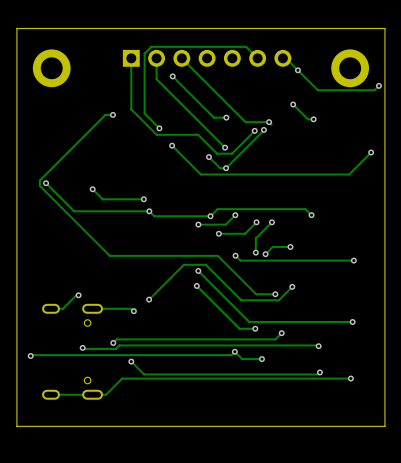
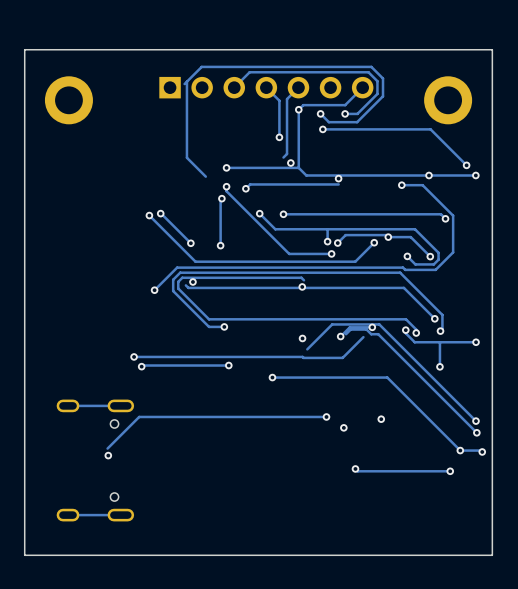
track: (151, 46) (246, 46) (257, 58) -> (195, 73) (201, 66) (371, 66) (383, 78) (383, 96) (357, 122) (328, 122) (320, 113)
track: (131, 58) (131, 109) (156, 134) (198, 134) (217, 153) (231, 153) (254, 130) -> none
track: (156, 58) (156, 79) (225, 147) -> none
track: (181, 58) (245, 122) (269, 122) (271, 124) -> (234, 87) (249, 72) (368, 72) (377, 81) (377, 93) (357, 113) (345, 113)
track: none -> (266, 87) (279, 100) (279, 137)
track: none -> (298, 87) (287, 99) (287, 153) (283, 157)
track: (282, 58) (285, 58) (317, 90) (374, 90) (378, 85) -> (362, 87) (345, 105) (303, 105) (298, 109) (298, 167)
via: (297, 70) -> none
via: none -> (298, 109)
track: (172, 76) (213, 117) (226, 117) -> none
via: (172, 76) -> none
via: none -> (320, 113)
via: none -> (345, 113)
via: (378, 85) -> none
track: none -> (322, 129) (430, 129) (466, 165)
via: none -> (322, 129)
via: none -> (279, 137)
track: (293, 104) (308, 119) (313, 119) -> none
via: (293, 104) -> none
track: (112, 114) (105, 114) (39, 180) (39, 185) (109, 255) (217, 255) (256, 294) (275, 294) -> none
via: (112, 114) -> none
via: (313, 119) -> none
via: none -> (466, 165)
via: none -> (226, 167)
track: none -> (298, 167) (306, 175) (475, 175)
track: none -> (298, 167) (226, 167)
via: (269, 122) -> none
via: none -> (429, 175)
via: none -> (475, 175)
via: (159, 128) -> none
track: (263, 129) (226, 168) (220, 168) (208, 157) -> none
via: (254, 130) -> none
track: none -> (338, 184) (250, 184) (245, 188)
track: none -> (401, 185) (422, 185) (453, 215) (453, 252) (435, 269) (405, 269) (402, 267) (177, 267) (154, 290)
via: none -> (401, 185)
track: none -> (226, 186) (226, 191) (289, 253) (331, 253)
via: none -> (226, 186)
via: none -> (245, 188)
track: (172, 145) (200, 174) (349, 174) (371, 152) -> none
track: none -> (220, 201) (220, 245)
via: (225, 147) -> none
via: (371, 152) -> none
track: none -> (160, 213) (190, 243)
via: none -> (160, 213)
track: none -> (259, 213) (275, 229) (415, 229) (438, 252) (438, 259) (433, 264) (415, 264) (407, 256)
via: none -> (259, 213)
via: (208, 157) -> none
track: none -> (149, 215) (195, 261) (355, 261) (374, 242)
via: none -> (149, 215)
track: none -> (283, 214) (441, 214) (445, 218)
via: none -> (283, 214)
via: none -> (445, 218)
via: (226, 168) -> none
track: none -> (327, 229) (327, 241)
via: none -> (388, 237)
via: none -> (327, 241)
via: none -> (190, 243)
track: none -> (337, 243) (345, 235) (410, 237) (430, 256)
via: none -> (337, 243)
via: none -> (374, 242)
via: none -> (220, 245)
track: (46, 183) (74, 211) (149, 211) (154, 216) (210, 216) (217, 209) (305, 209) (311, 215) -> none
via: (46, 183) -> none
track: (92, 189) (102, 199) (143, 199) -> none
via: (92, 189) -> none
via: none -> (331, 253)
via: none -> (407, 256)
via: none -> (430, 256)
via: (143, 199) -> none
track: none -> (303, 280) (301, 277) (182, 277) (178, 281) (178, 288) (209, 319) (405, 319) (416, 329) (416, 333)
track: none -> (185, 285) (188, 287) (403, 287) (434, 318)
track: (235, 215) (225, 224) (198, 224) -> none
via: (311, 215) -> none
via: (210, 216) -> none
via: none -> (154, 290)
track: (256, 222) (245, 233) (218, 233) -> none
via: (256, 222) -> none
track: (271, 222) (255, 238) (255, 252) -> none
via: (271, 222) -> none
via: (198, 224) -> none
via: (218, 233) -> none
via: none -> (434, 318)
track: none -> (224, 326) (209, 326) (173, 291) (173, 279) (180, 272) (400, 272) (442, 314) (442, 329) (440, 331)
via: none -> (224, 326)
track: none -> (405, 330) (405, 333) (414, 342) (476, 342)
via: none -> (405, 330)
via: none -> (440, 331)
via: none -> (416, 333)
via: (255, 252) -> none
track: none -> (346, 334) (350, 329) (366, 329) (371, 334) (378, 334) (476, 432)
track: none -> (363, 337) (342, 357) (134, 356)
track: (235, 255) (240, 260) (353, 260) -> none
track: none -> (439, 342) (439, 366)
via: none -> (476, 342)
via: (353, 260) -> none
track: none -> (307, 349) (332, 324) (379, 324) (476, 421)
via: none -> (134, 356)
track: (198, 270) (249, 321) (352, 321) -> none
via: (198, 270) -> none
via: none -> (141, 366)
track: none -> (228, 365) (141, 366)
via: none -> (228, 365)
via: none -> (439, 366)
track: (196, 285) (239, 328) (255, 328) -> none
via: (196, 285) -> none
track: none -> (272, 377) (387, 377) (460, 450) (482, 451)
via: none -> (272, 377)
track: (292, 286) (278, 300) (241, 300) (205, 264) (183, 264) (149, 299) -> none
via: (292, 286) -> none
via: (275, 294) -> none
track: (78, 295) (62, 308) -> (114, 405) (83, 405)
via: (78, 295) -> none
via: (149, 299) -> none
track: (92, 308) (131, 308) (133, 311) -> none
via: (133, 311) -> none
track: none -> (326, 416) (139, 416) (107, 448)
via: none -> (326, 416)
via: none -> (381, 419)
via: none -> (476, 421)
via: (352, 321) -> none
via: none -> (343, 427)
via: (255, 328) -> none
via: none -> (476, 432)
track: (281, 333) (275, 339) (116, 339) (113, 342) -> none
via: (281, 333) -> none
via: (113, 342) -> none
via: none -> (460, 450)
via: none -> (482, 451)
track: (318, 346) (119, 345) (115, 348) (82, 347) -> none
via: (318, 346) -> none
via: (234, 351) -> none
track: (30, 355) (231, 355) (234, 351) (242, 359) (261, 359) -> none
via: (30, 355) -> none
track: none -> (355, 468) (357, 471) (450, 471)
via: none -> (355, 468)
via: (261, 359) -> none
via: none -> (450, 471)
track: (131, 361) (144, 374) (317, 374) (319, 372) -> none
via: (131, 361) -> none
via: (319, 372) -> none
track: (350, 378) (122, 378) (106, 394) (87, 394) -> none
via: (350, 378) -> none

